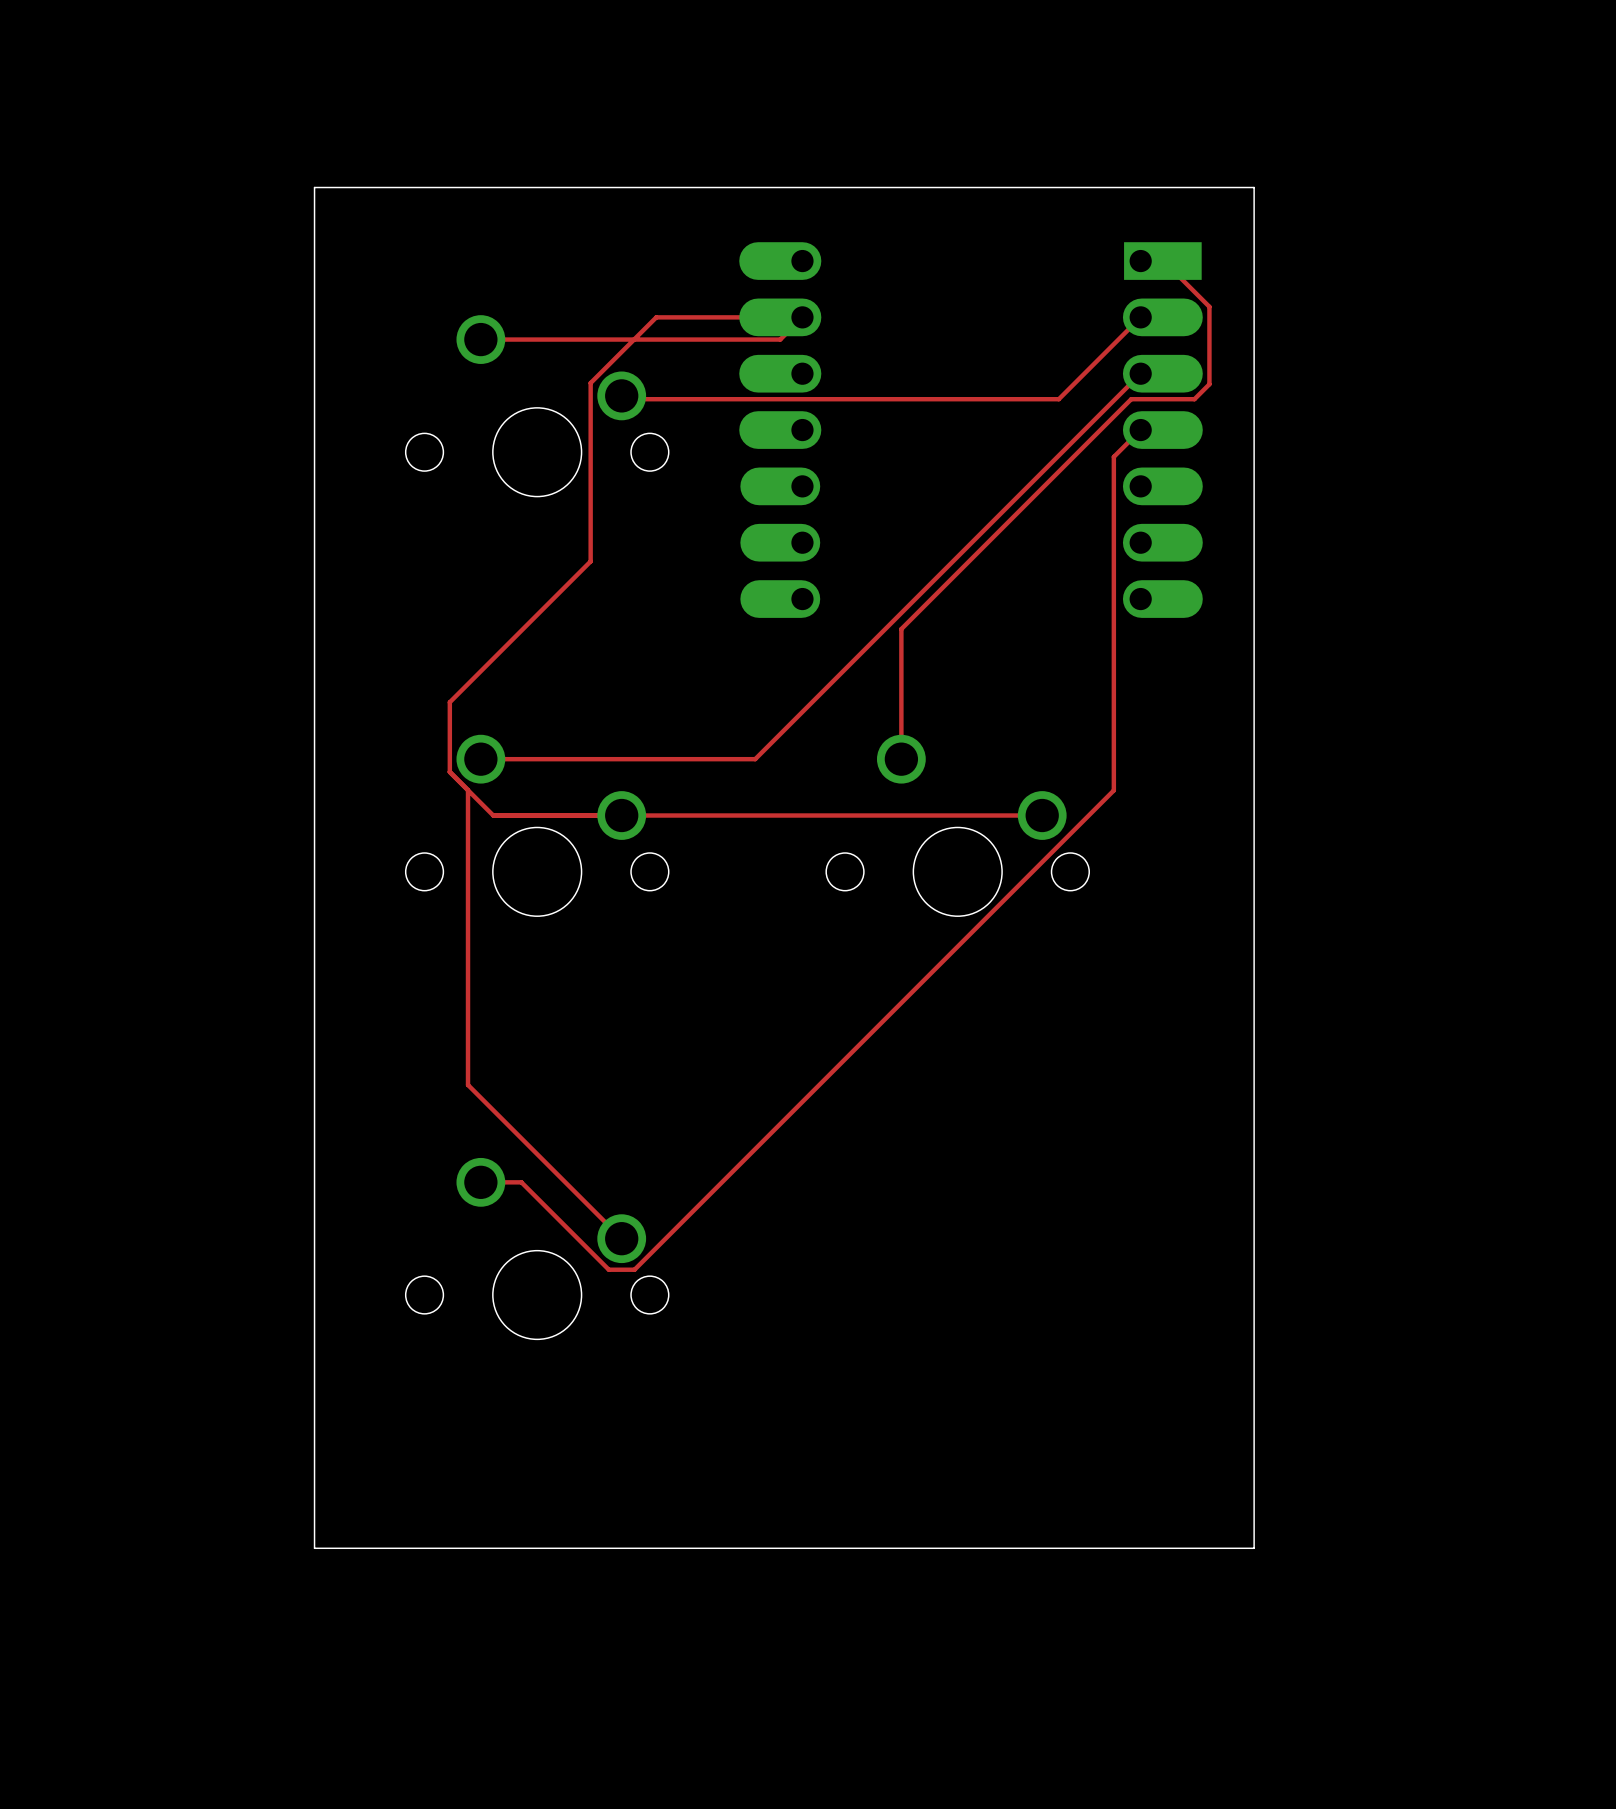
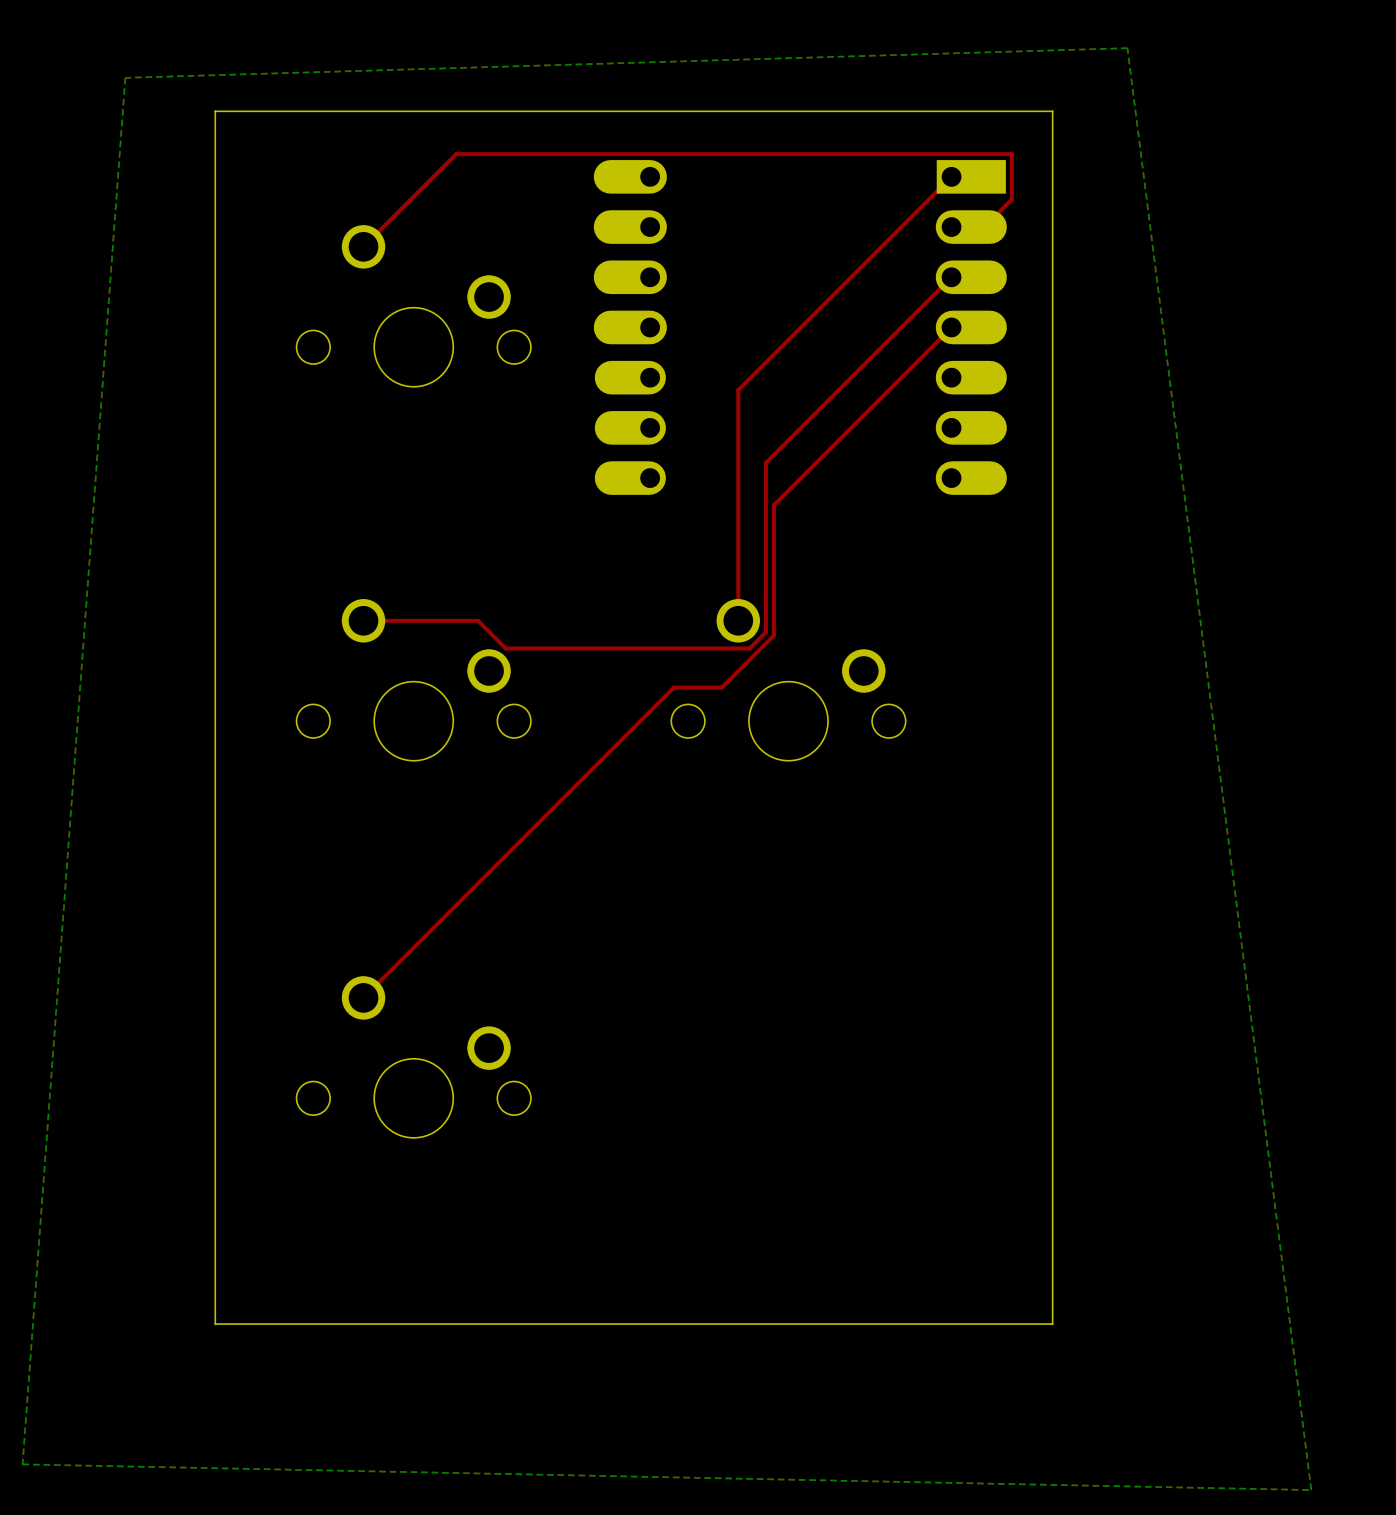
bottom zone outline: none -> (1127, 48) (125, 77) (22, 1464) (1311, 1490) (1127, 48)
top track: (1140, 261) (1163, 261) (1209, 306) (1209, 384) (1194, 399) (1131, 399) (901, 629) -> (951, 176) (738, 390) (738, 504)
top track: (1140, 317) (1058, 399) (625, 399) (621, 395) -> (951, 227) (984, 227) (1011, 199) (1011, 154) (456, 154) (363, 246)
top track: (480, 339) (780, 339) (802, 317) (656, 317) (590, 383) (590, 561) (449, 702) (449, 772) (493, 815) (1042, 815) -> none
top track: (1113, 456) (1113, 790) (634, 1269) (608, 1269) (521, 1182) (480, 1182) -> (927, 351) (773, 505) (773, 635) (721, 687) (673, 687) (363, 997)
top track: (932, 581) (755, 759) (609, 759) -> (765, 462) (765, 632) (749, 648) (505, 648) (477, 620)
top track: (468, 790) (468, 1084) (621, 1238) -> none

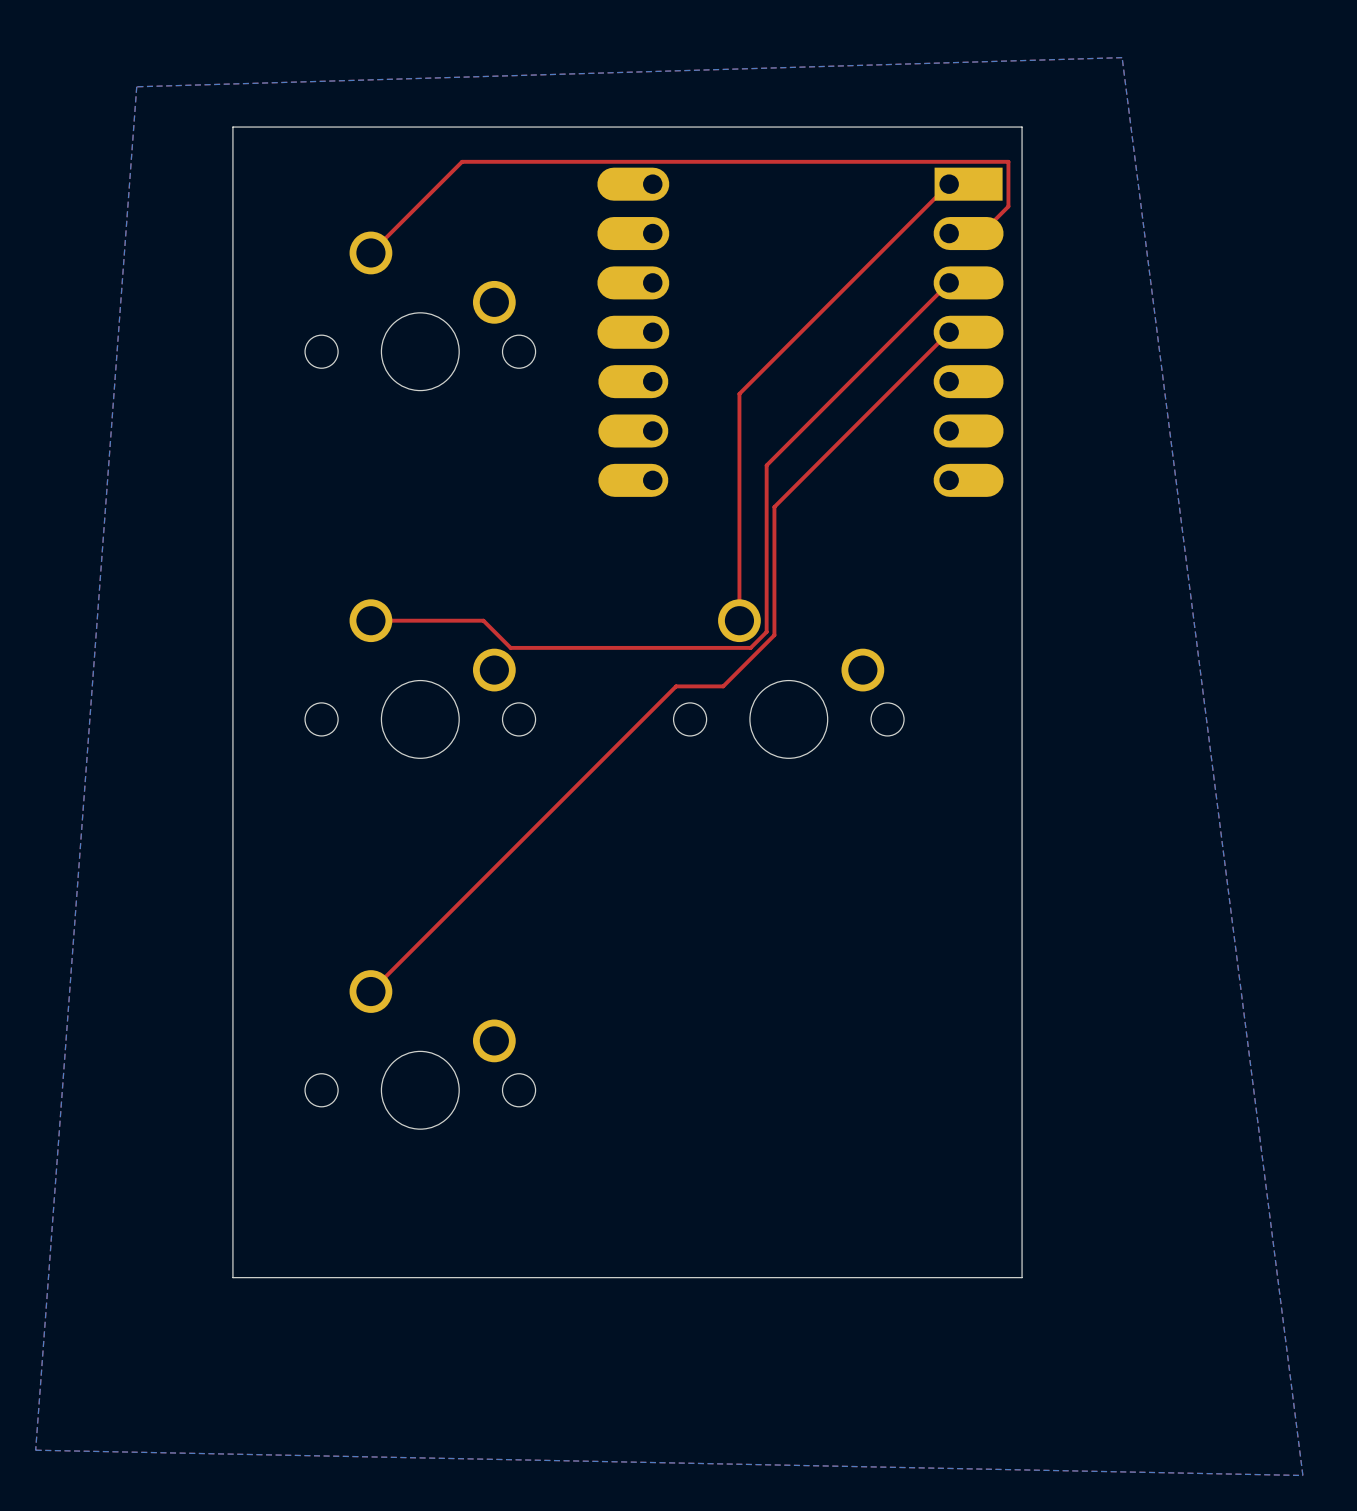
board edge: (1052, 111) (215, 111) (215, 1324) (1052, 1324) (1052, 111) -> (1022, 127) (1022, 1277) (232, 1277) (232, 127) (1022, 127)

